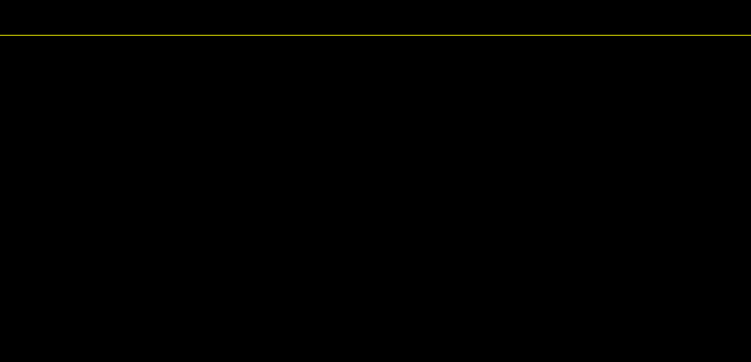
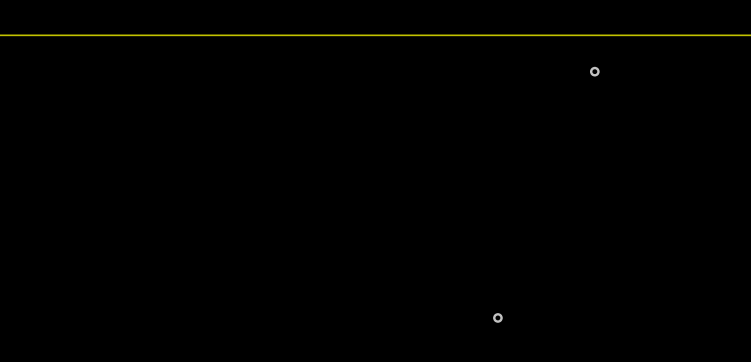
via: none -> (594, 71)
via: none -> (497, 317)

